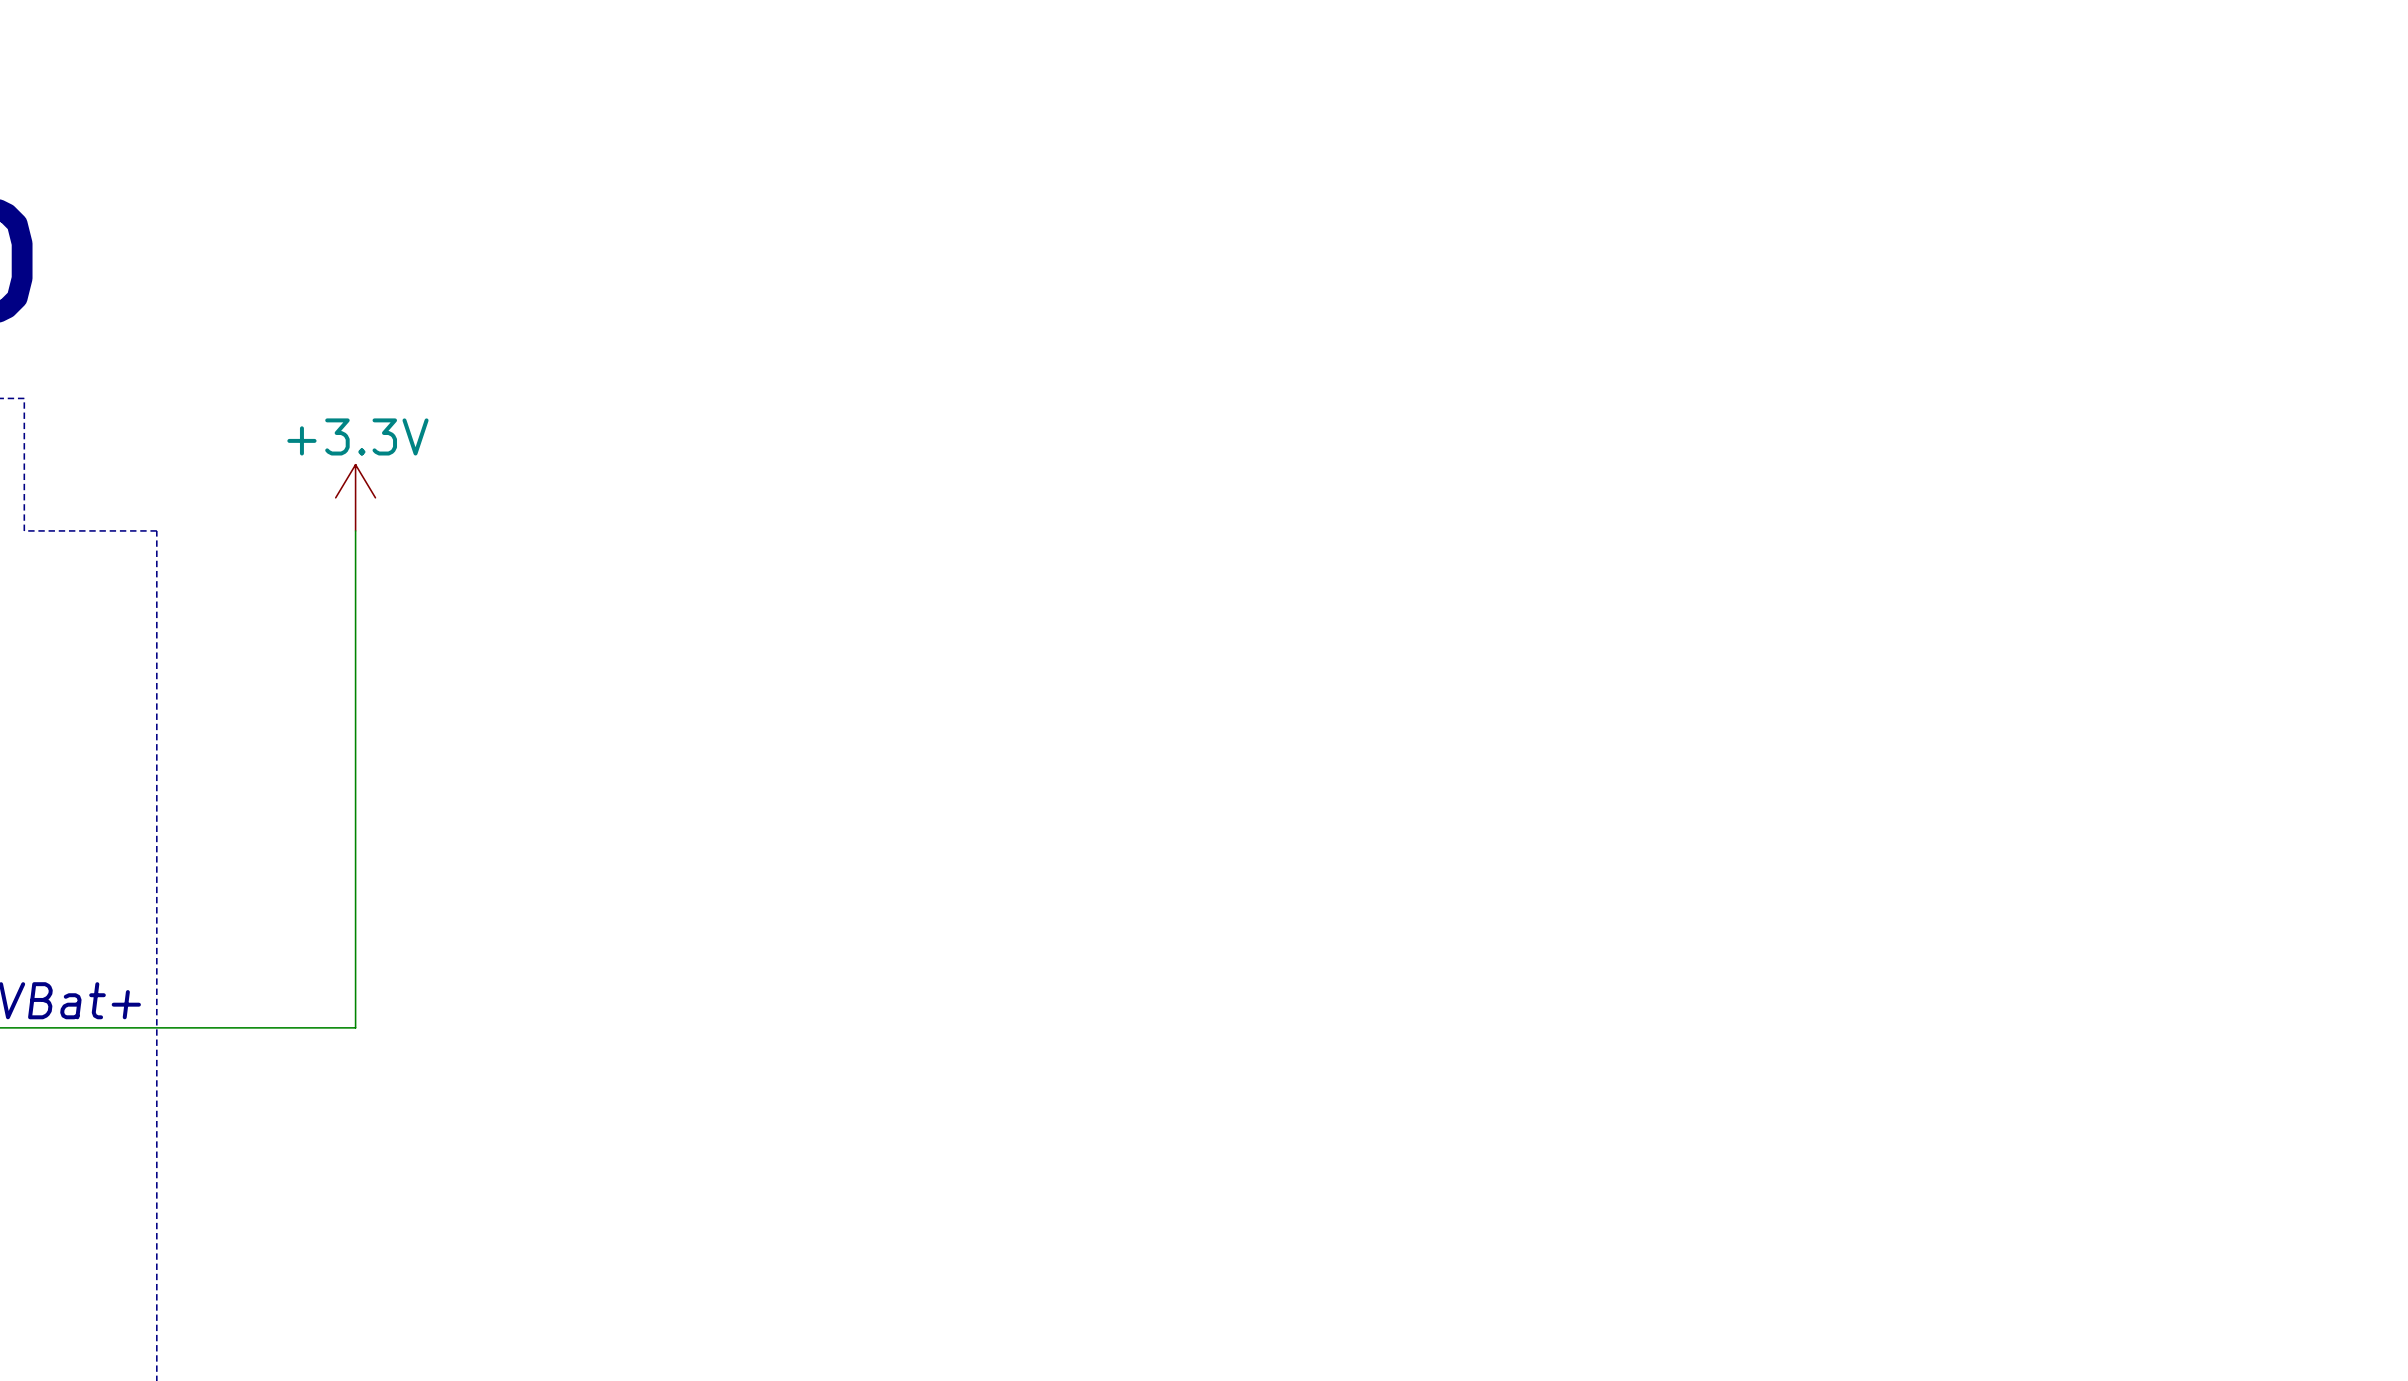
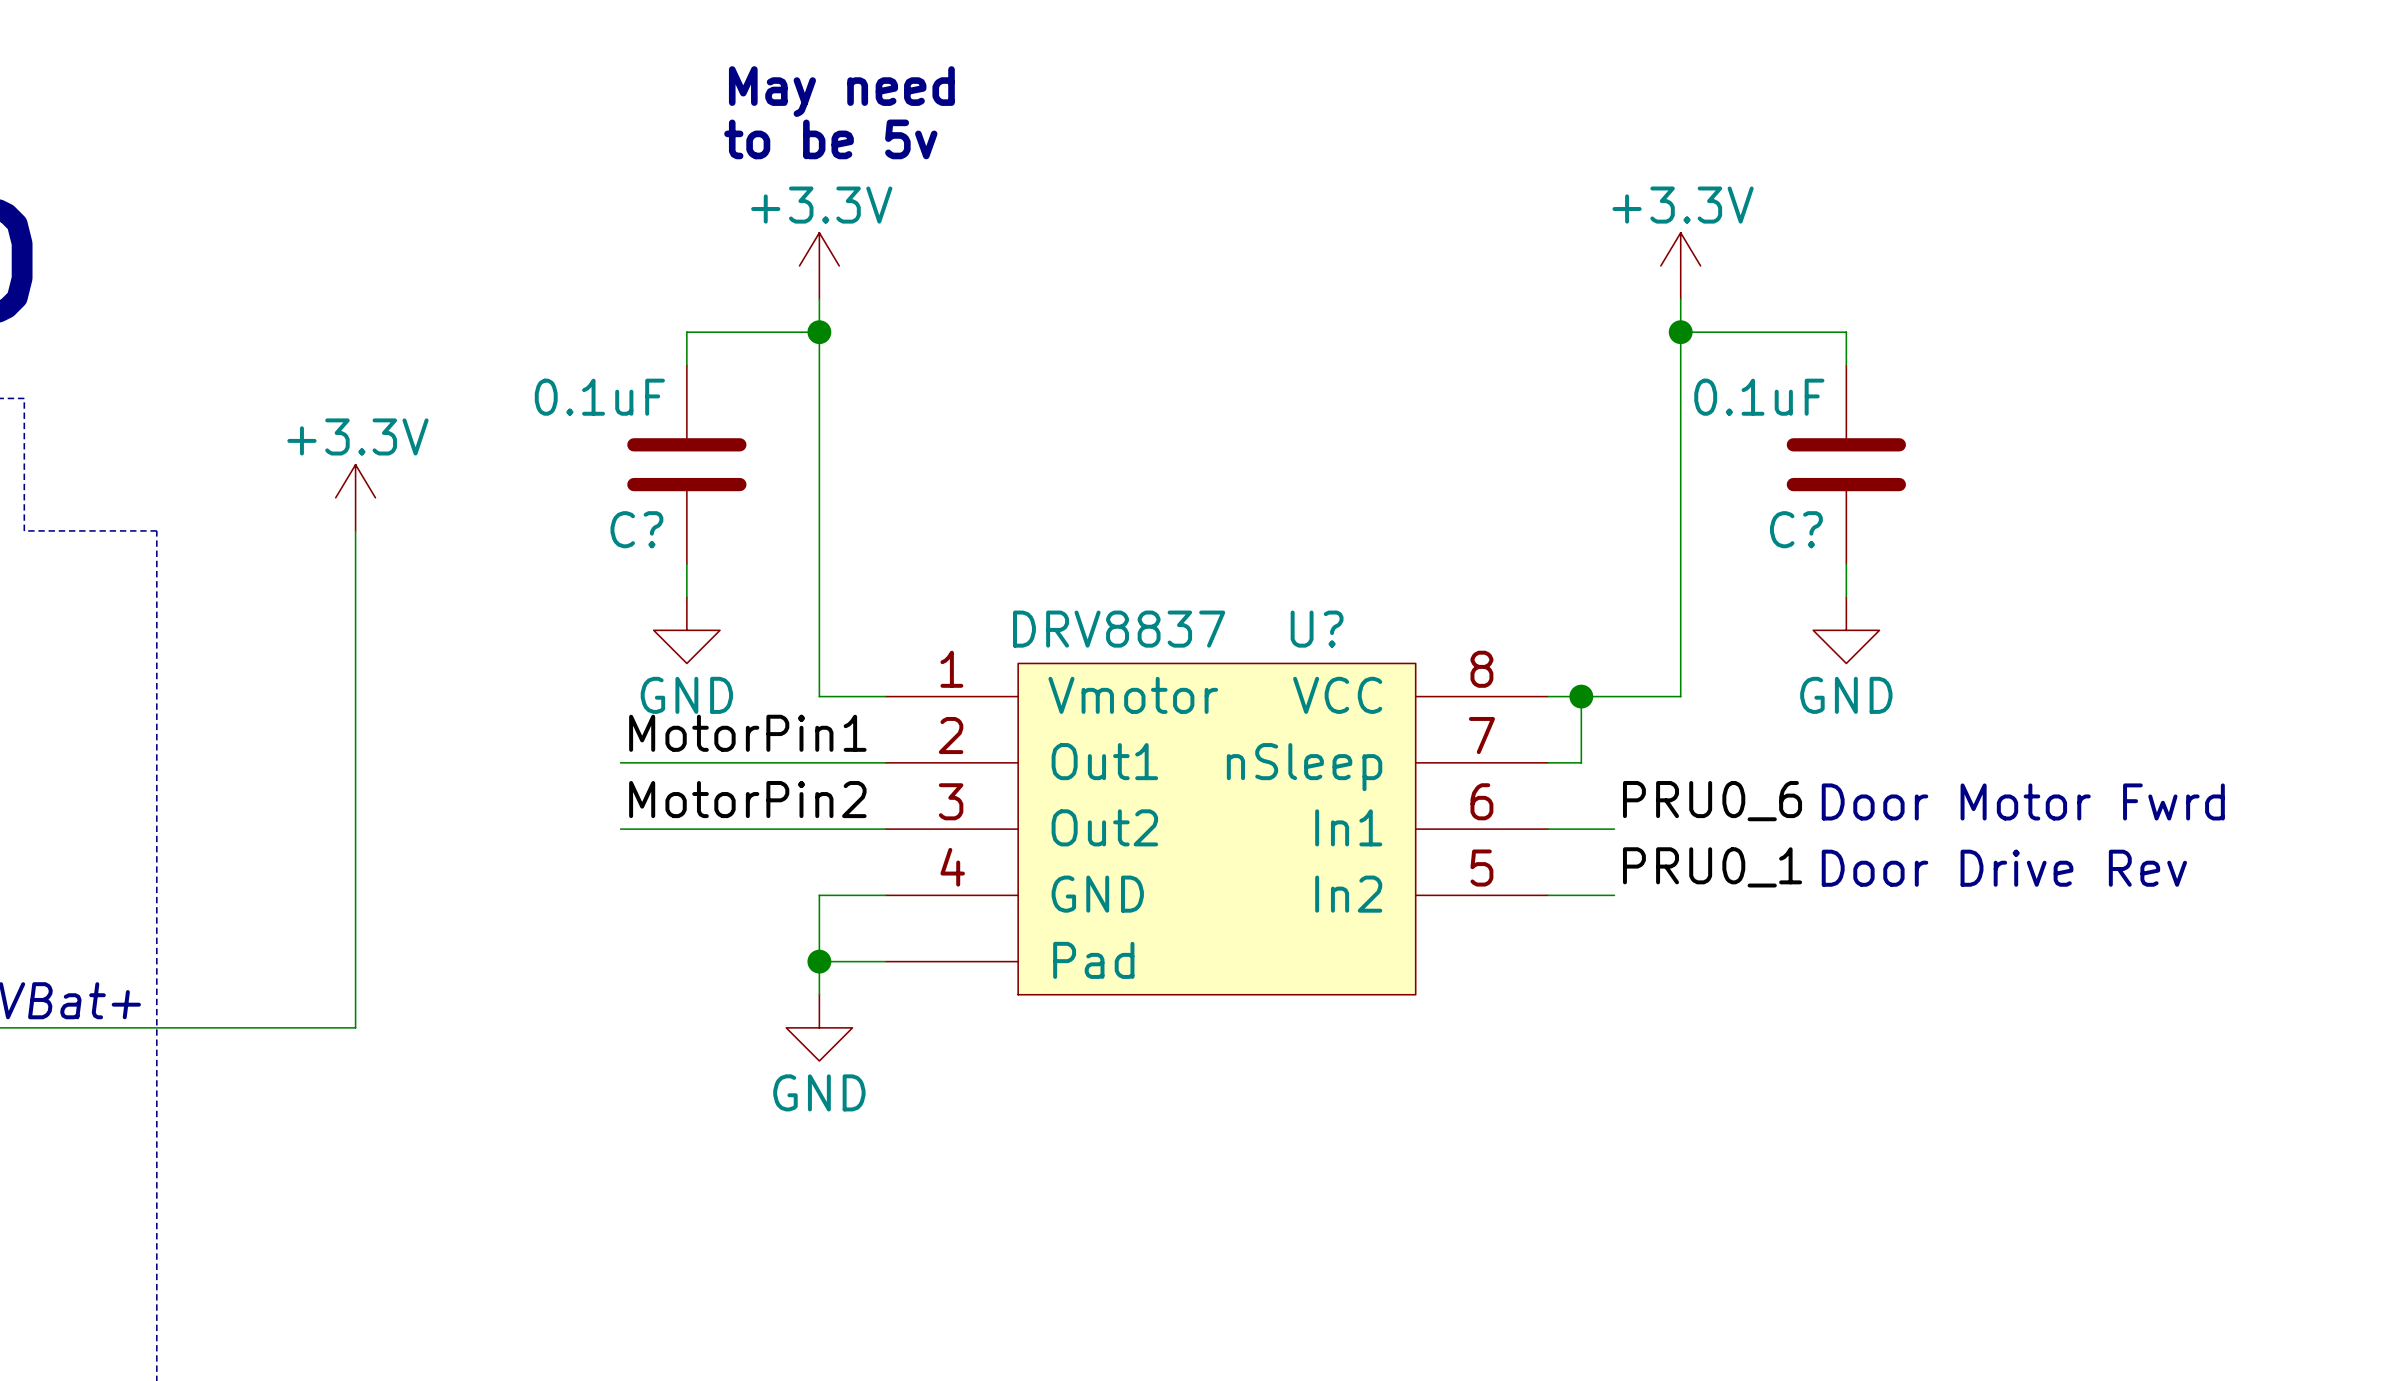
text: none -> May need (841, 91)
text: none -> to be 5v (830, 139)
power symbol: none -> +3.3V (819, 265)
power symbol: none -> +3.3V (1680, 265)
wire: none -> (819, 299) (819, 696) (885, 696)
wire: none -> (1680, 299) (1680, 696) (1548, 696)
wire: none -> (819, 332) (686, 332) (686, 365)
junction: none -> (819, 332)
wire: none -> (1680, 332) (1846, 332) (1846, 365)
junction: none -> (1680, 332)
C?: none -> 0.1uF (686, 464)
C?: none -> 0.1uF (1846, 464)
wire: none -> (686, 564) (686, 597)
wire: none -> (1846, 564) (1846, 597)
power symbol: none -> GND (686, 630)
power symbol: none -> GND (1846, 630)
wire: none -> (1581, 696) (1581, 762) (1548, 762)
junction: none -> (1581, 696)
label: none -> MotorPin1 (747, 733)
wire: none -> (620, 762) (885, 762)
label: none -> MotorPin2 (747, 799)
label: none -> PRU0_6 (1712, 801)
text: none -> Door Motor Fwrd (2023, 801)
wire: none -> (620, 829) (885, 829)
U?: none -> DRV8837 (1216, 829)
wire: none -> (1548, 829) (1614, 829)
label: none -> PRU0_1 (1712, 867)
text: none -> Door Drive Rev (2004, 868)
wire: none -> (885, 895) (819, 895) (819, 994)
wire: none -> (1548, 895) (1614, 895)
wire: none -> (819, 961) (885, 961)
junction: none -> (819, 961)
power symbol: none -> GND (819, 1027)

